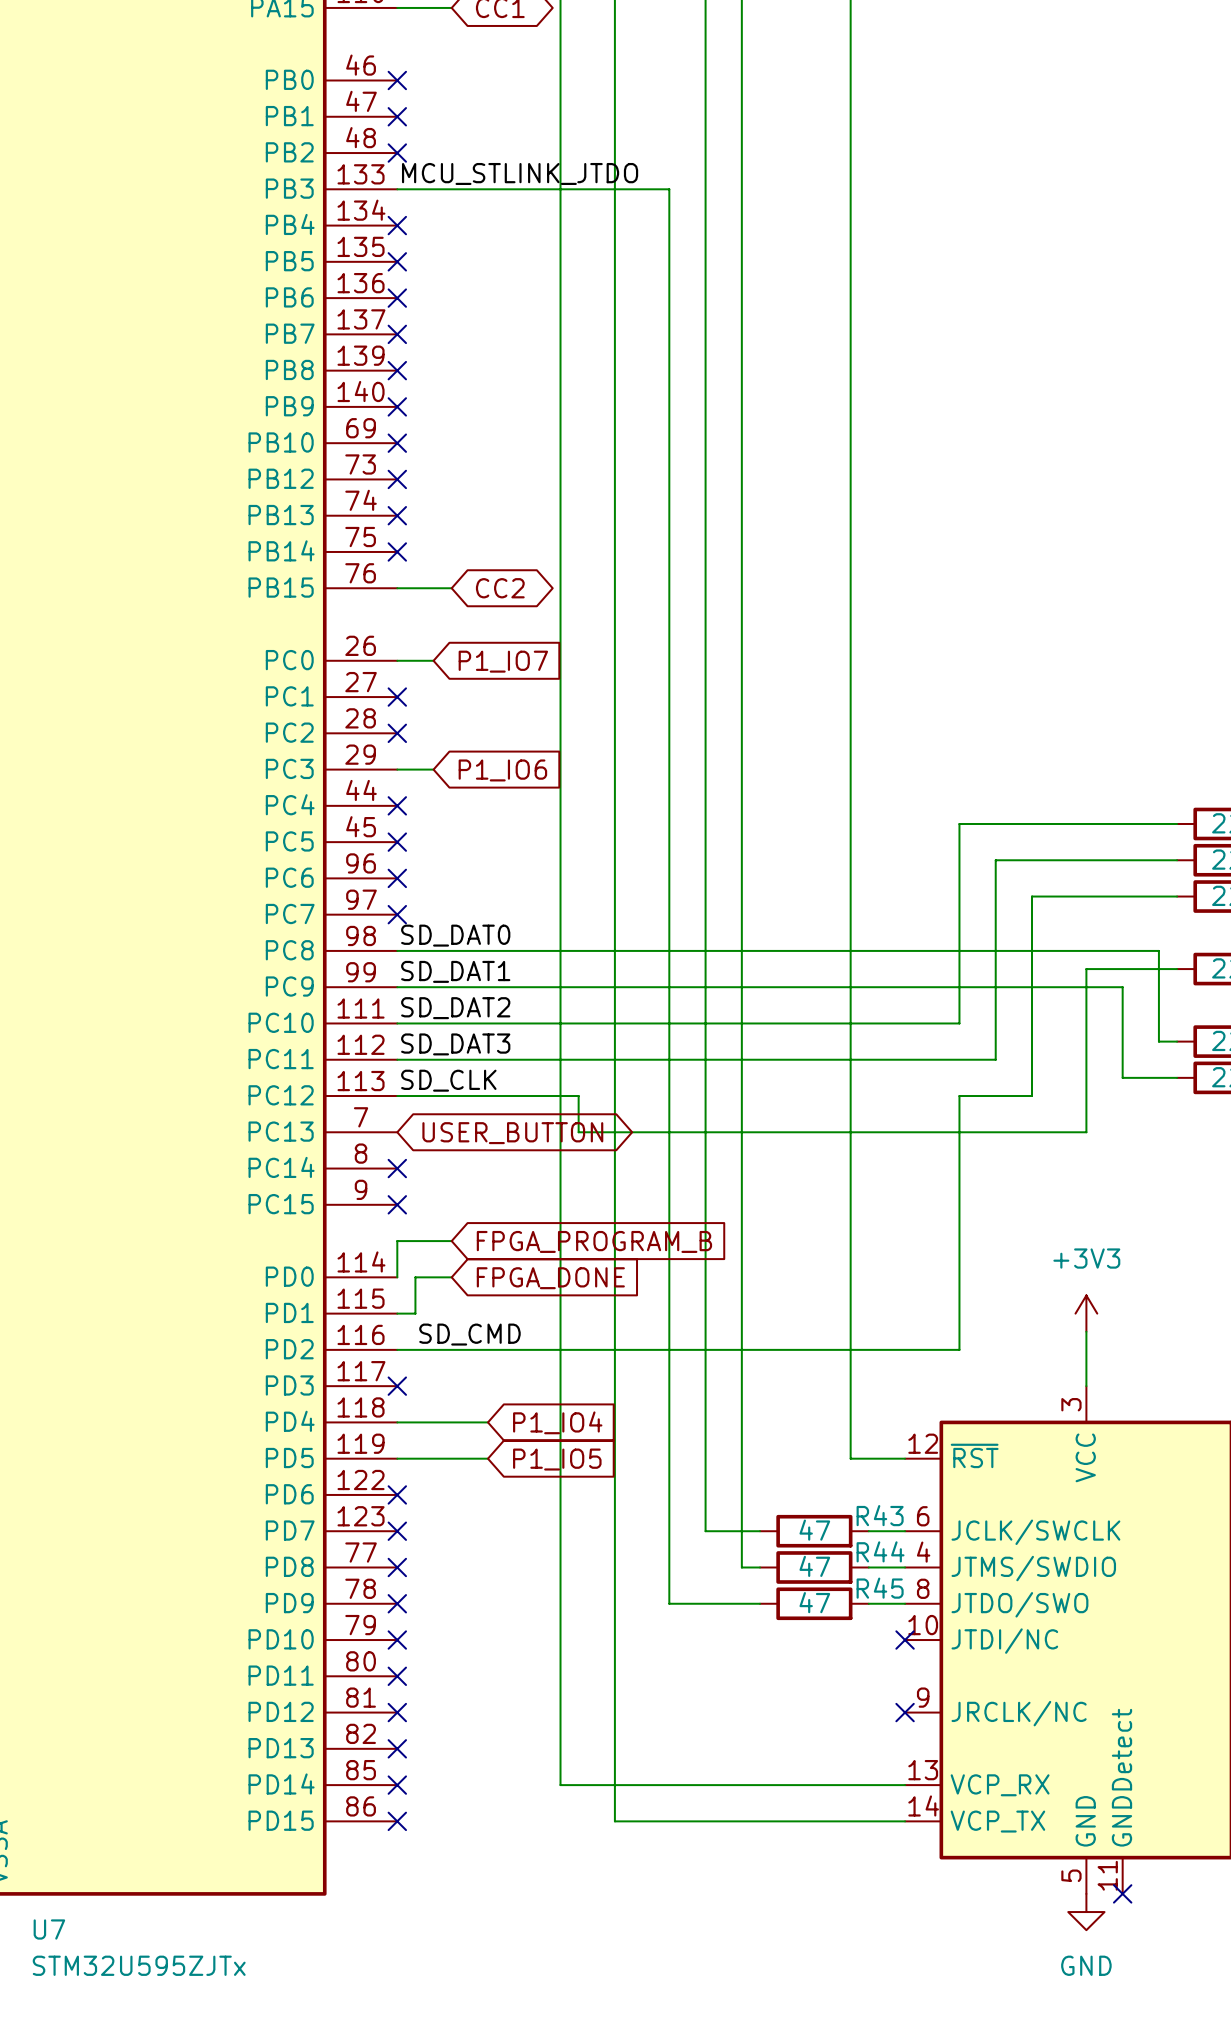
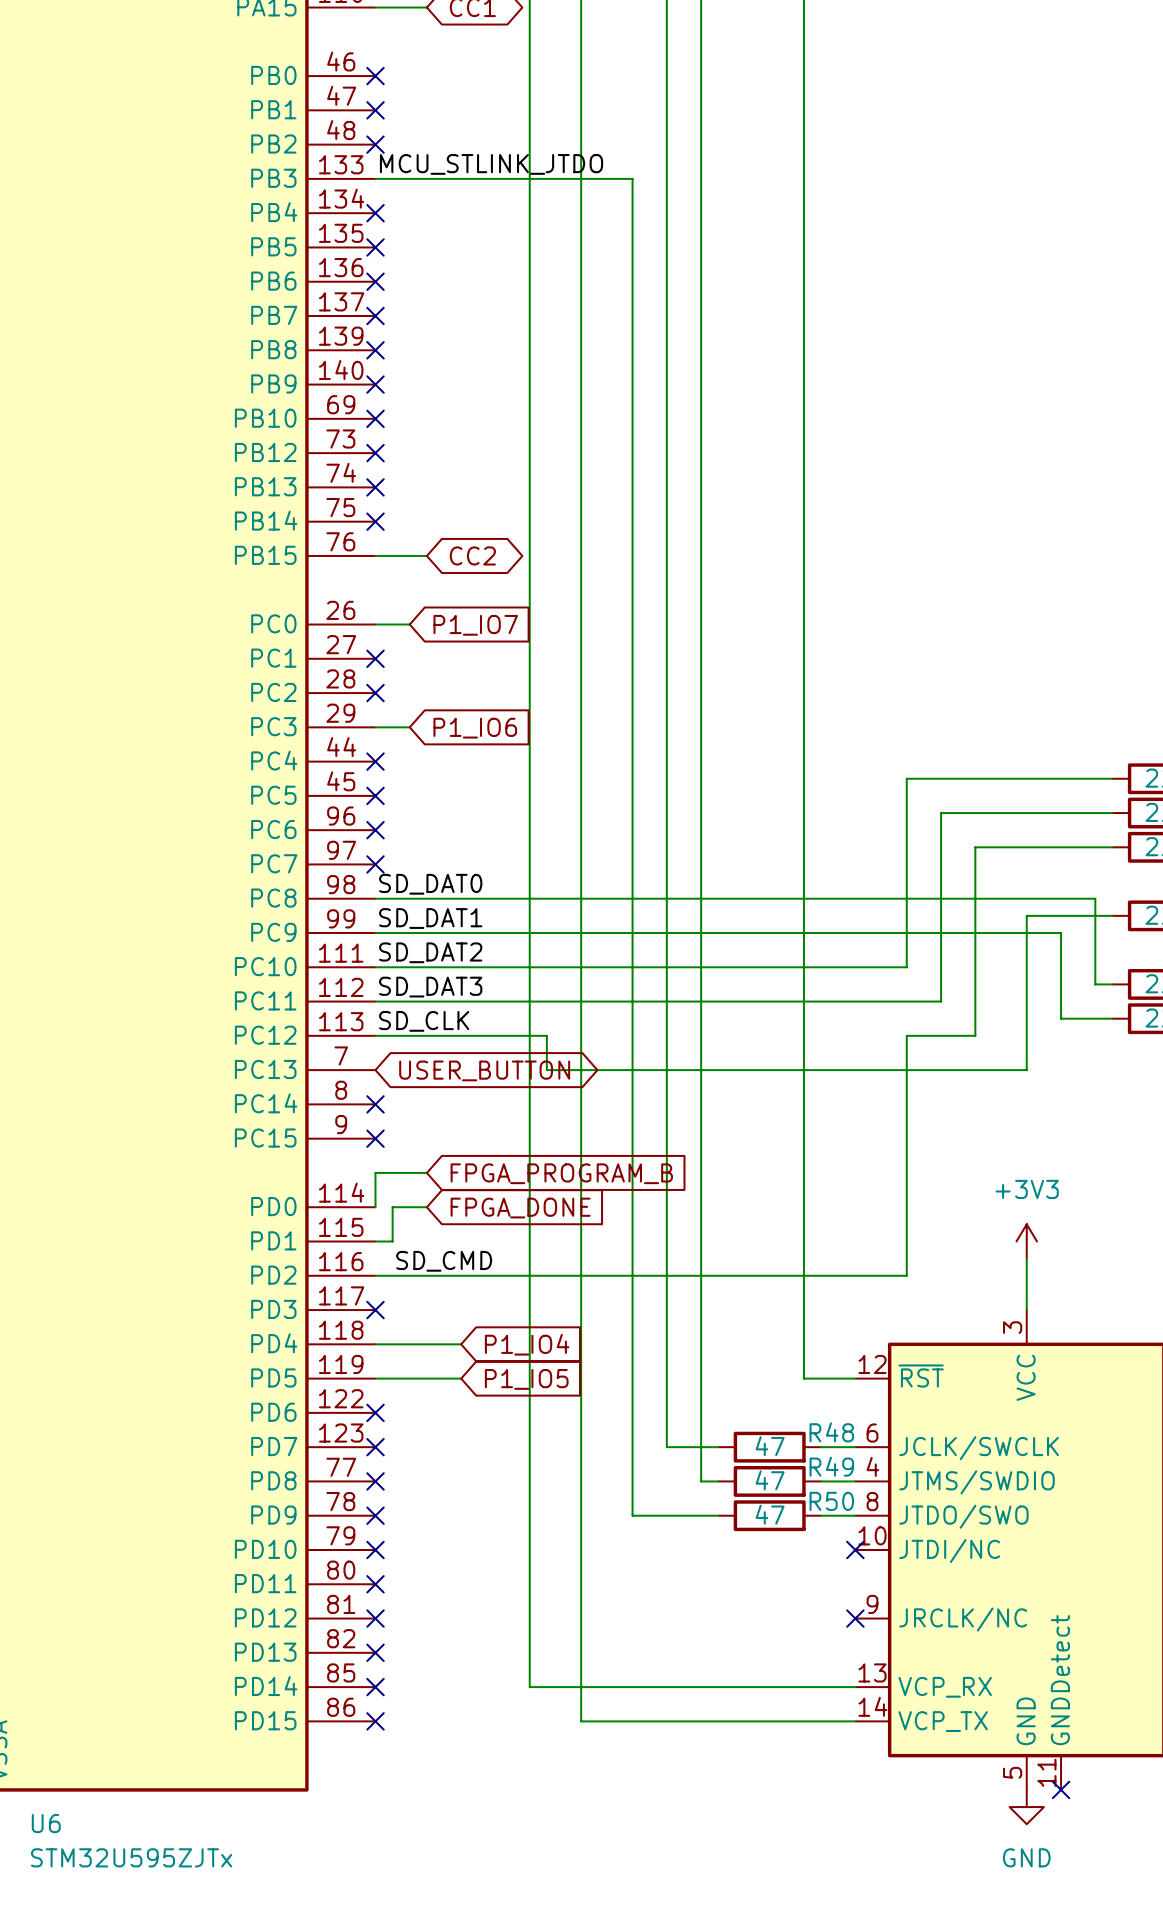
R43 name: R43 (880, 1515) -> R48 (831, 1432)
R44 name: R44 (880, 1551) -> R49 (831, 1466)
R45 name: R45 (880, 1588) -> R50 (831, 1501)
U7 name: U7 (49, 1929) -> U6 (46, 1823)

